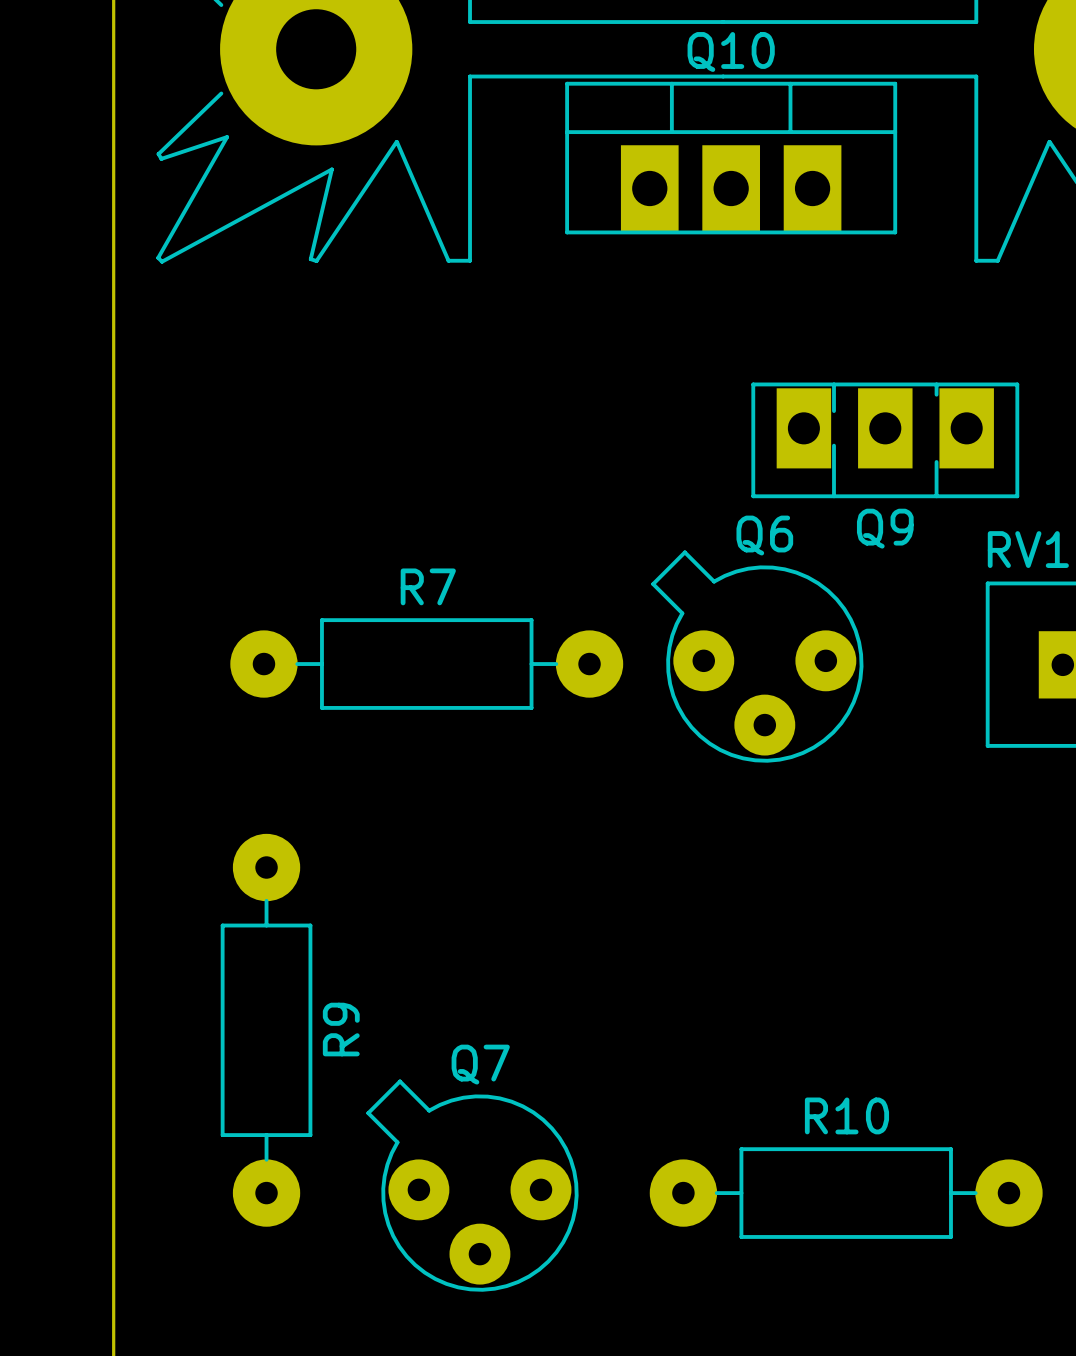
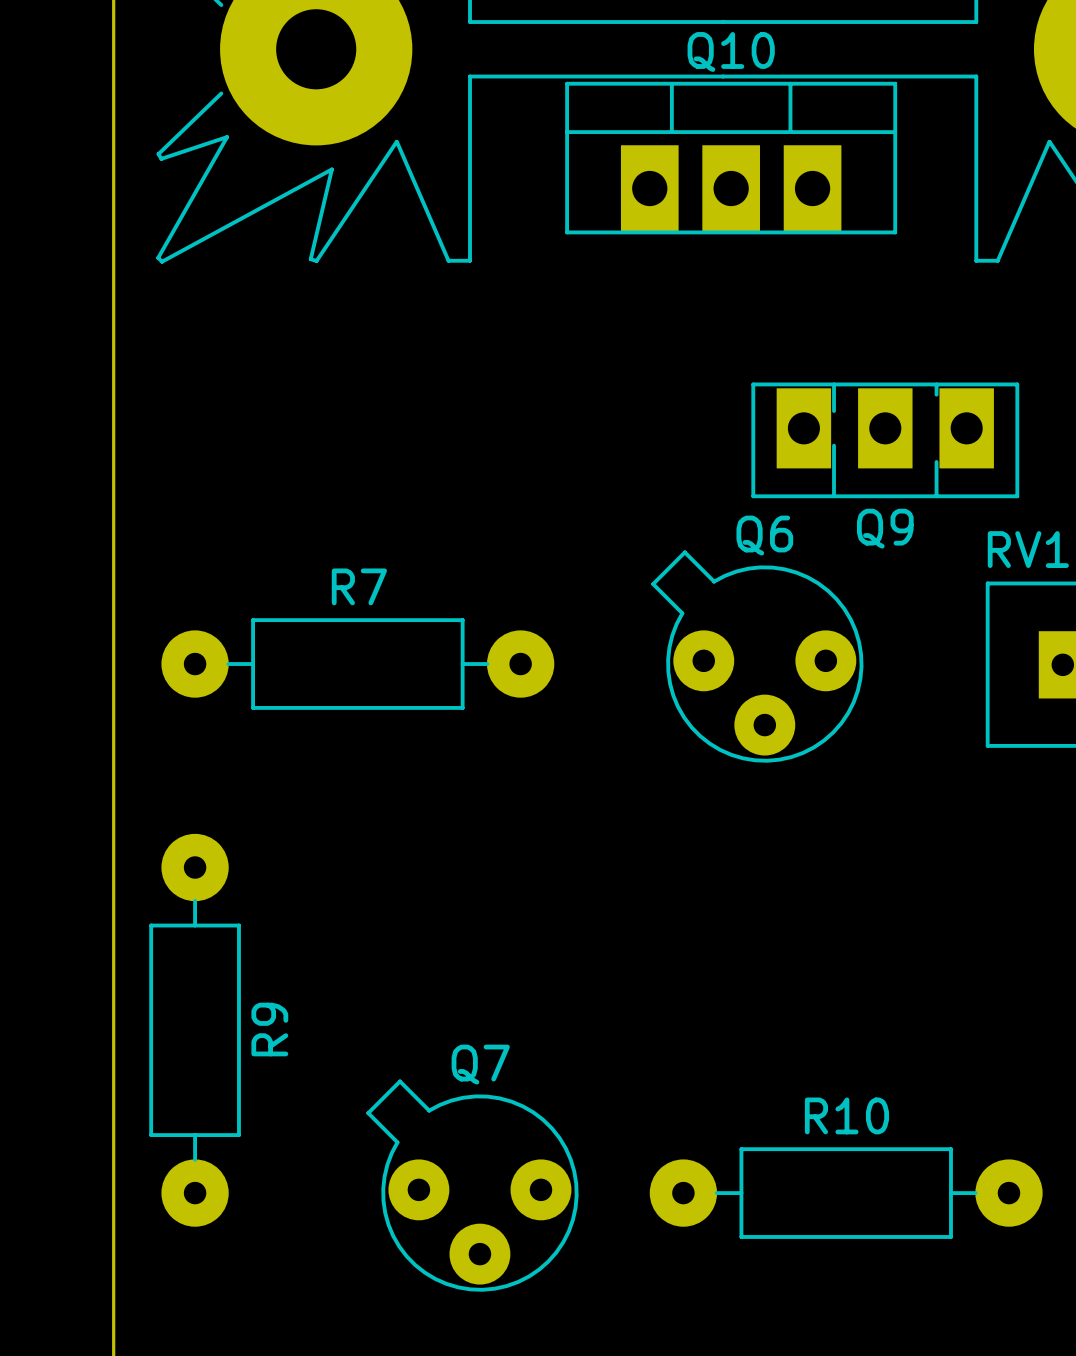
R7 position: (426, 664) -> (357, 664)
R9 position: (266, 1030) -> (195, 1030)

